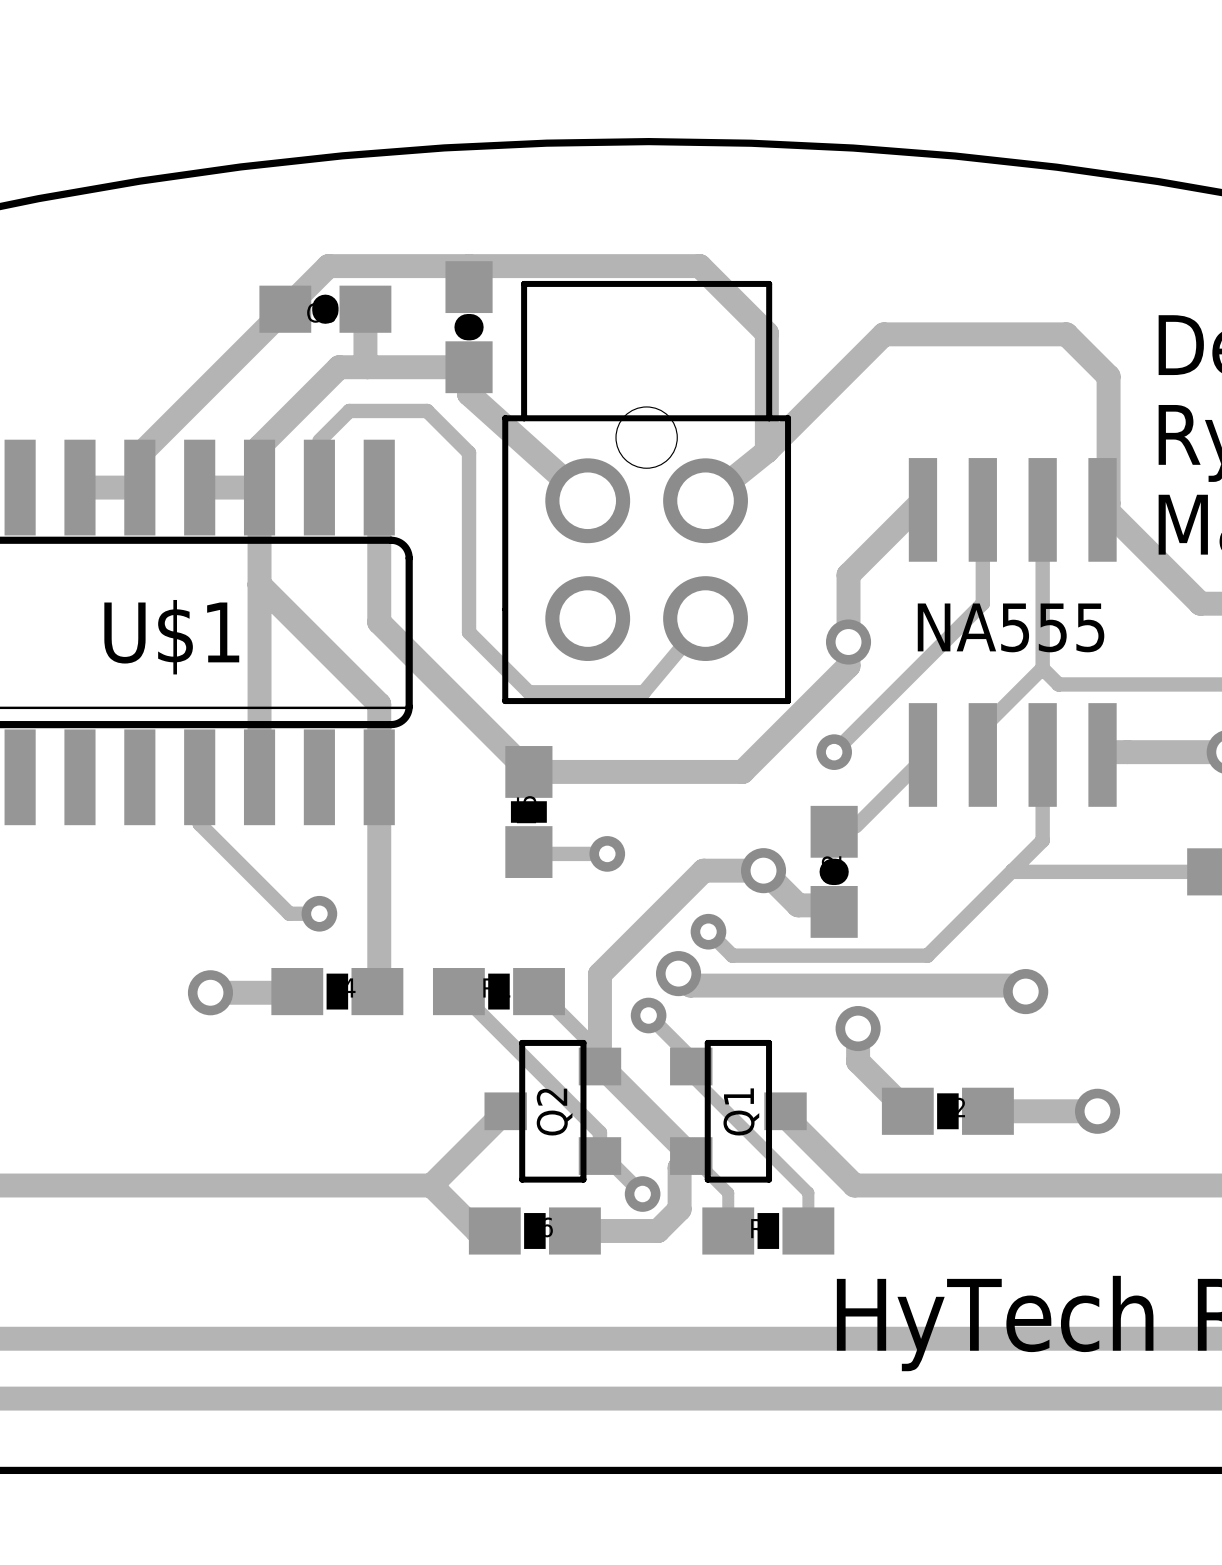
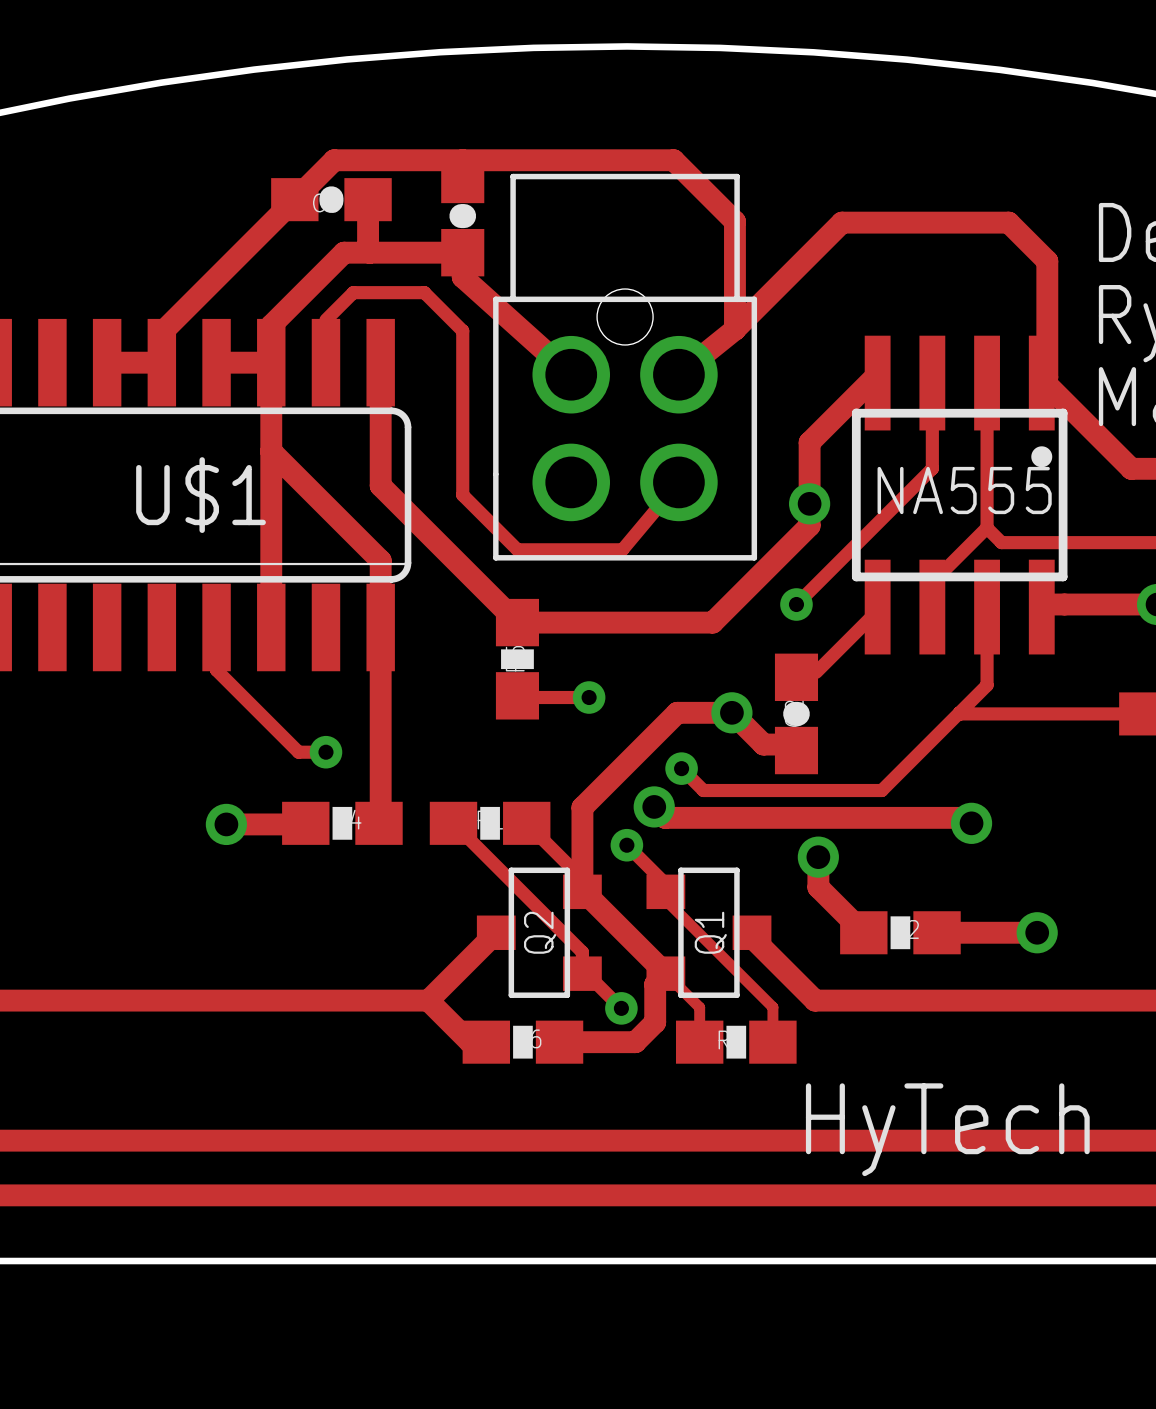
NA555 footprint: [908, 458, 1117, 807] -> [851, 335, 1068, 655]

